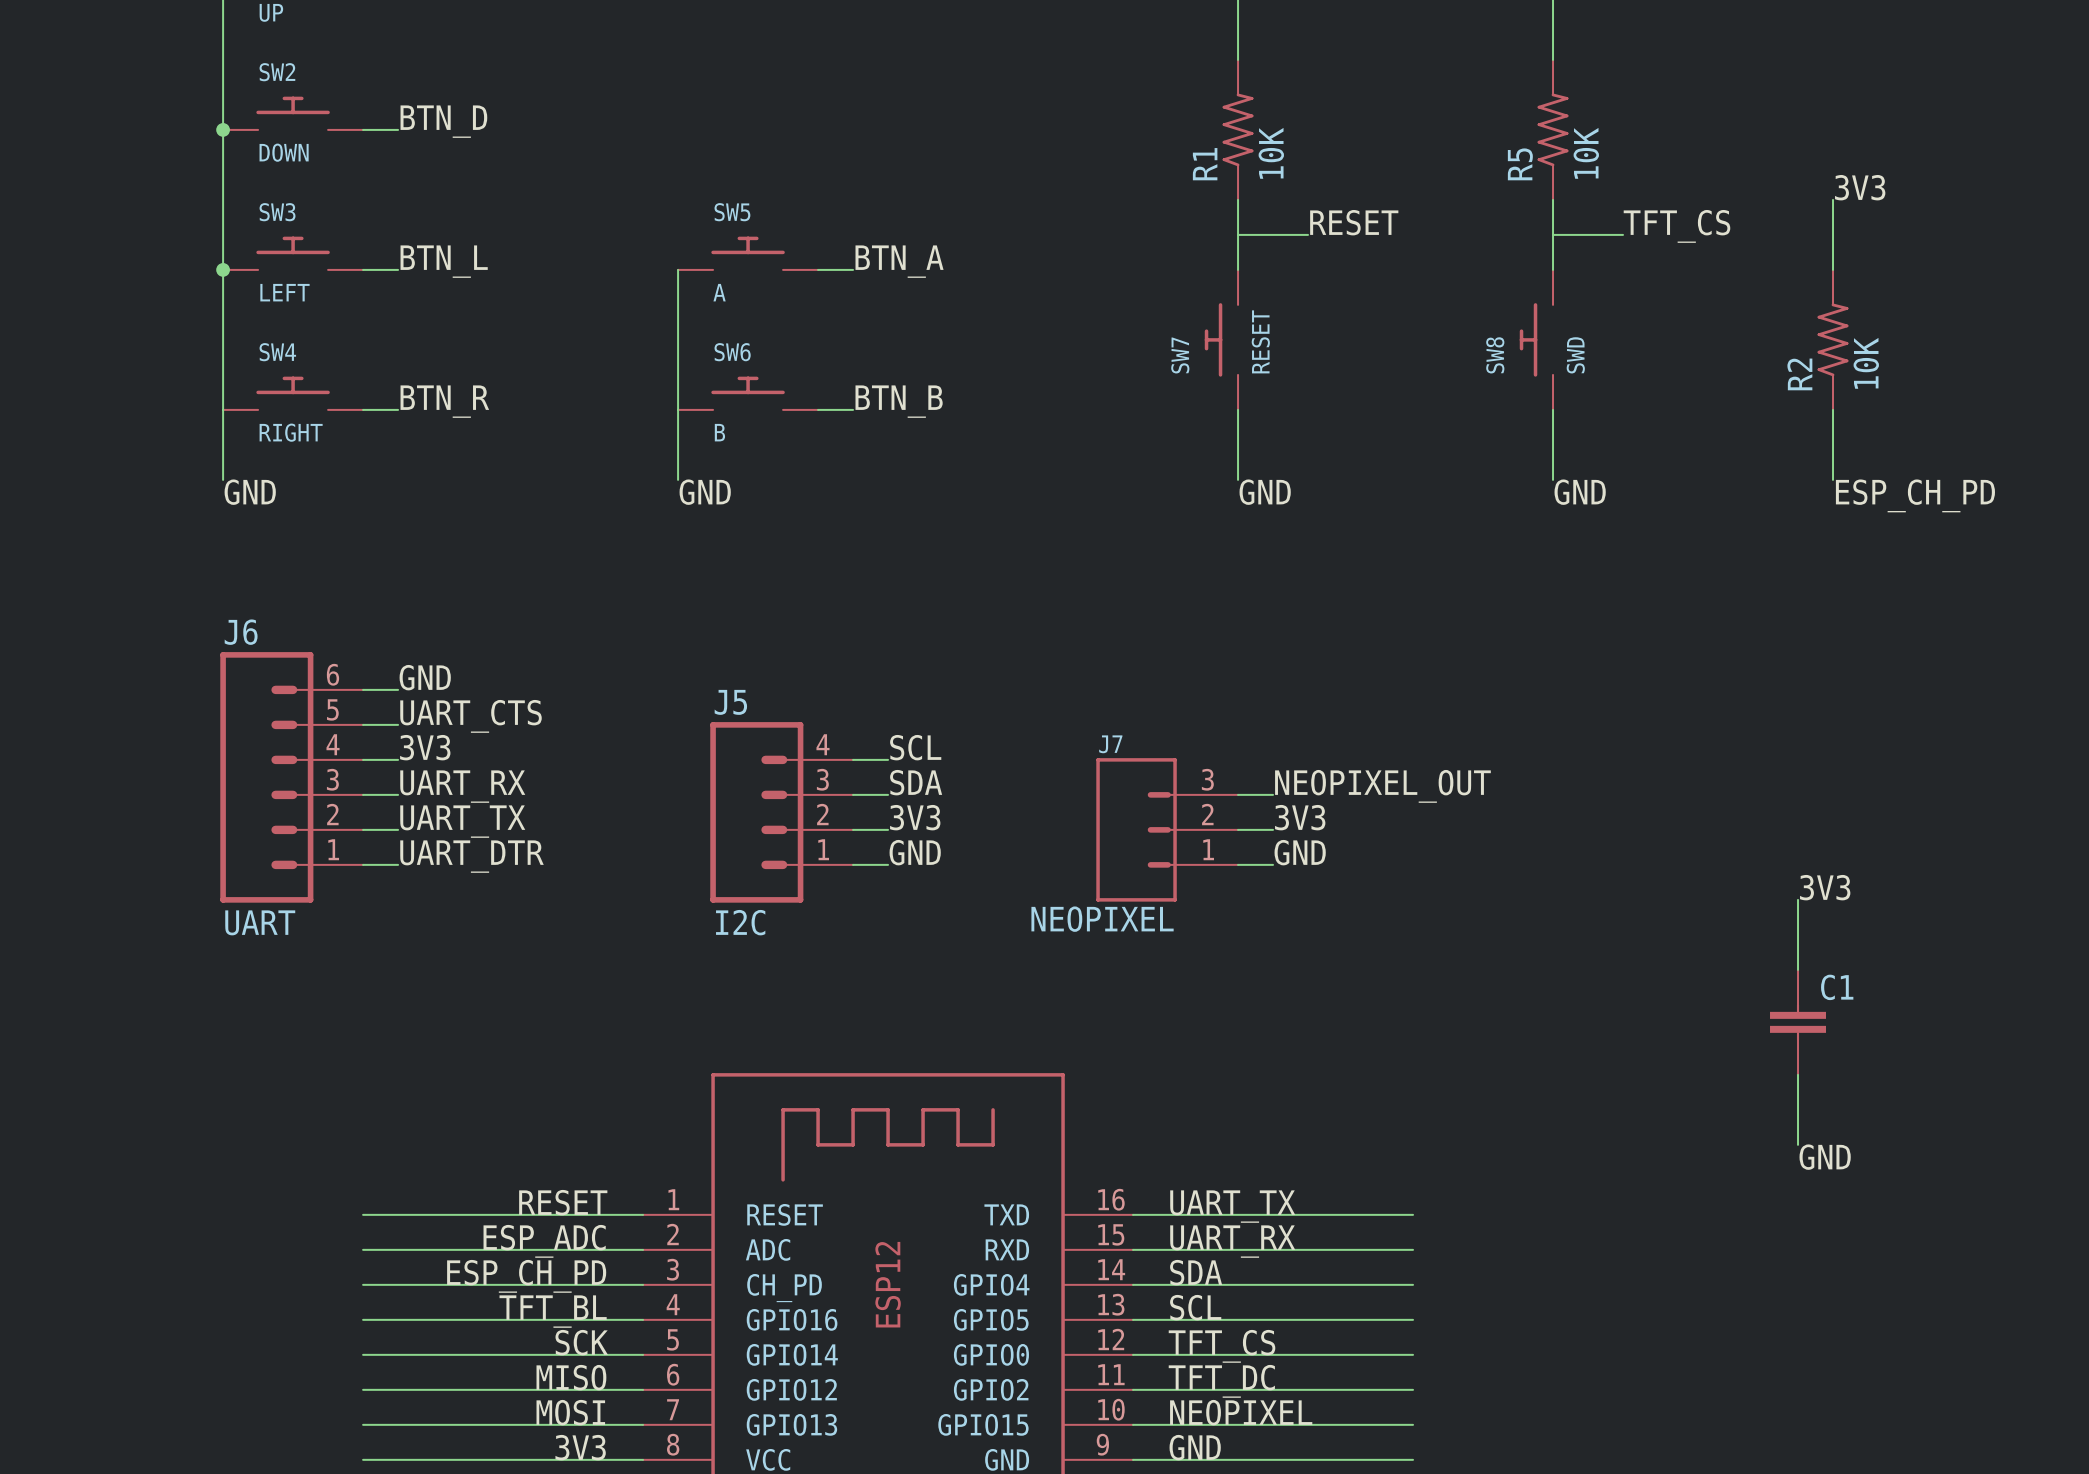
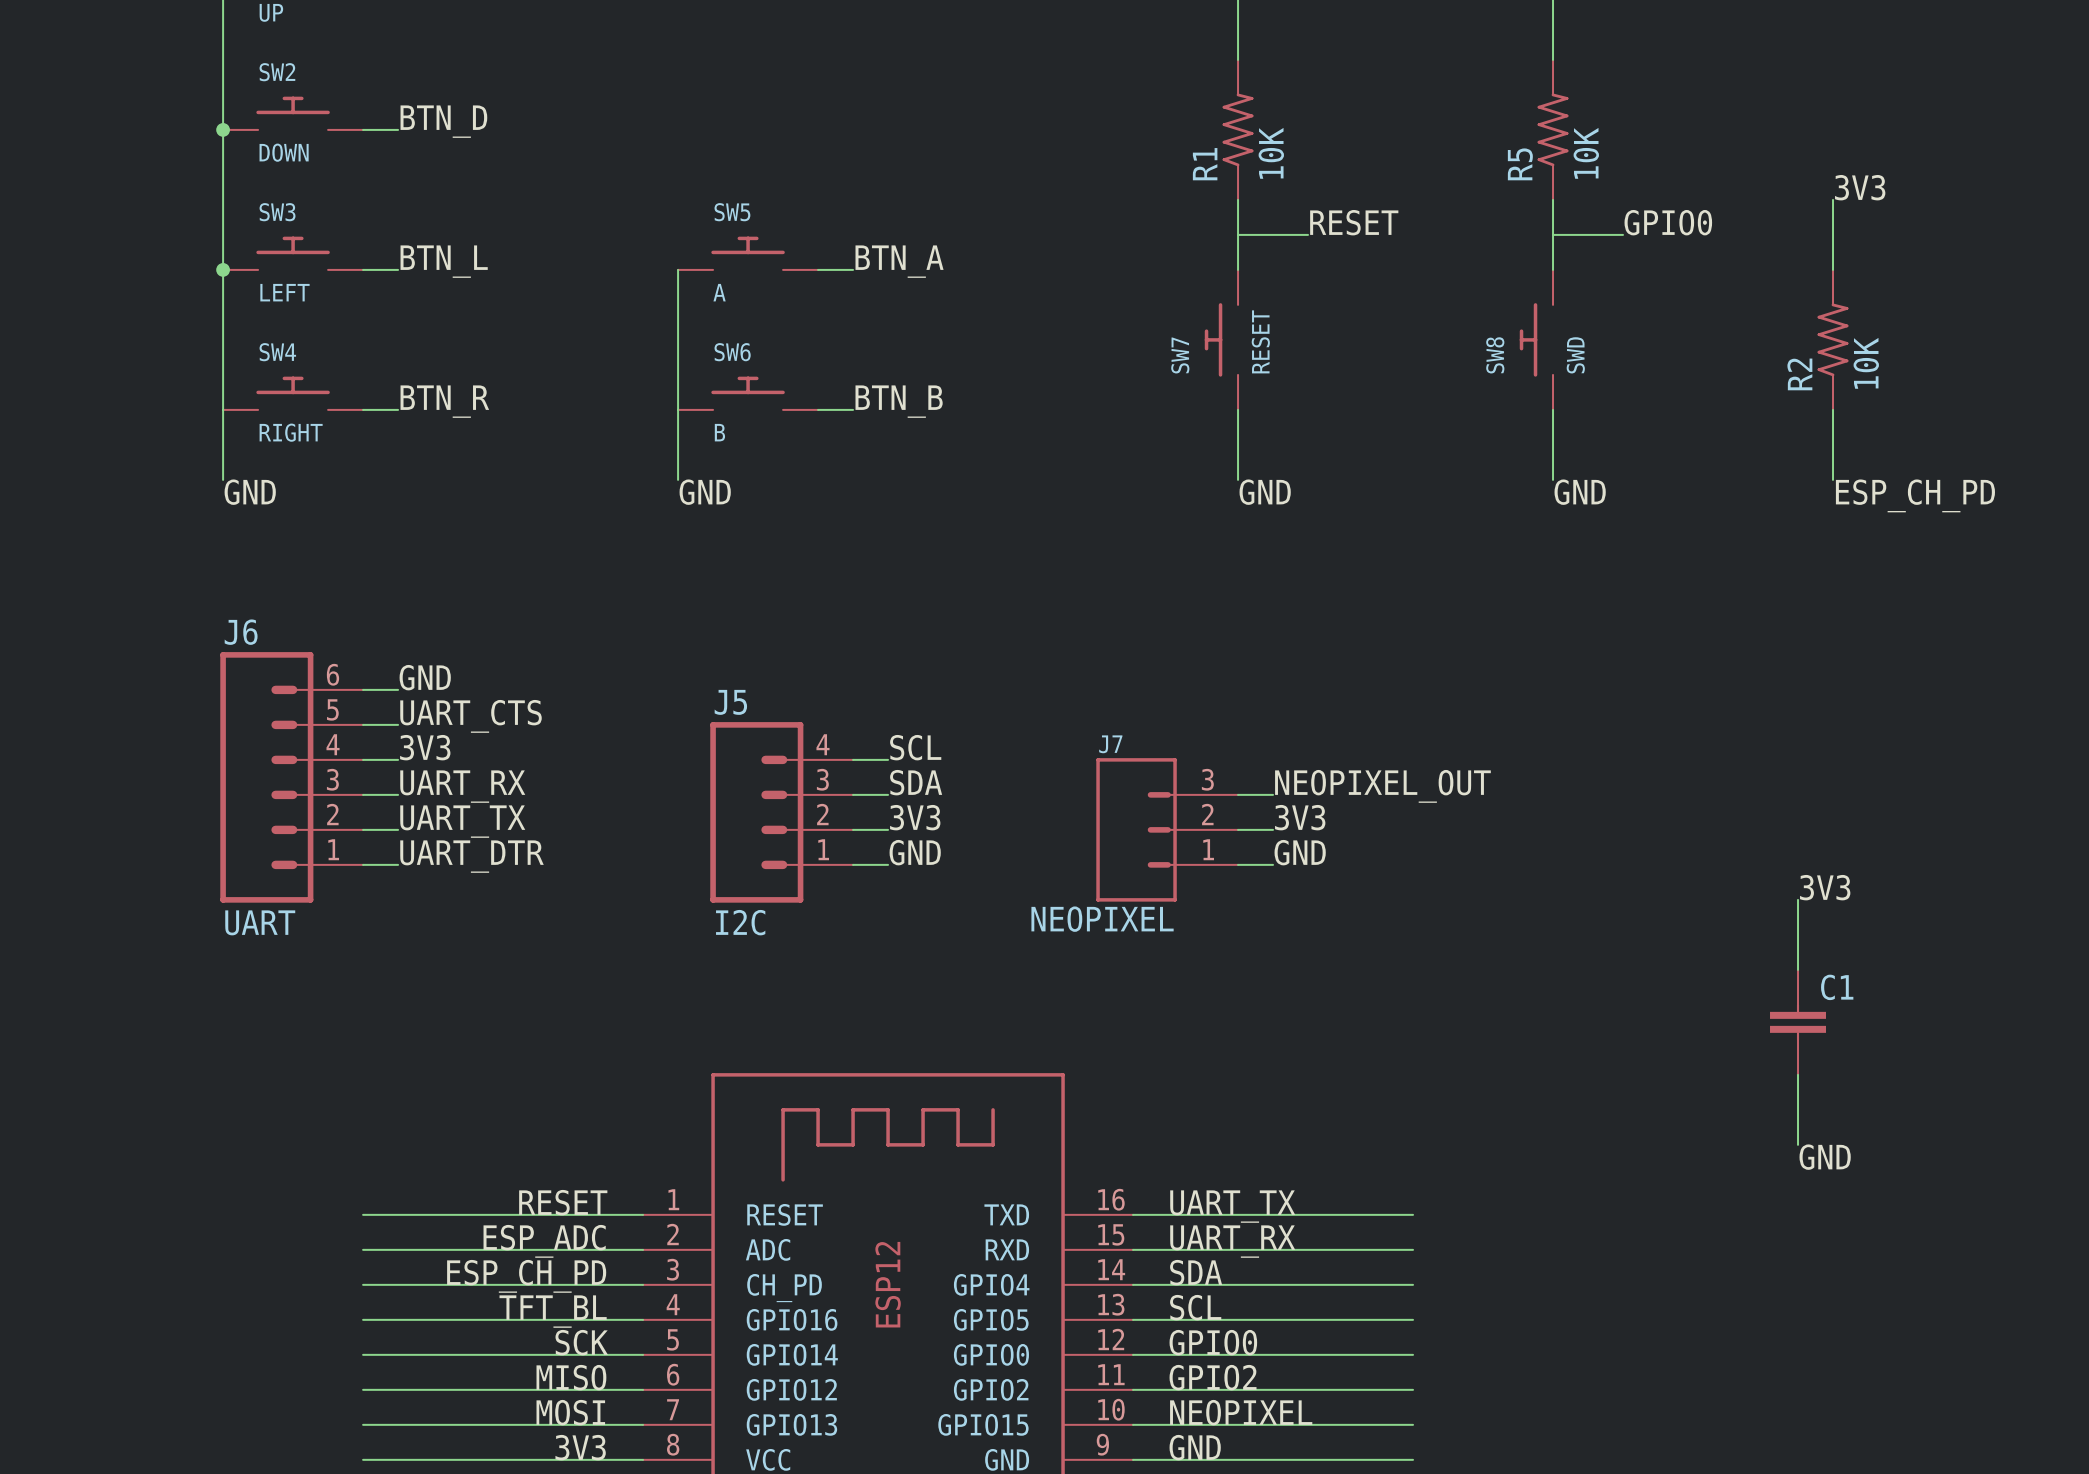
label: TFT_CS (1676, 226) -> GPIO0 (1668, 222)
label: TFT_CS (1222, 1346) -> GPIO0 (1213, 1342)
label: TFT_DC (1221, 1381) -> GPIO2 (1213, 1377)

